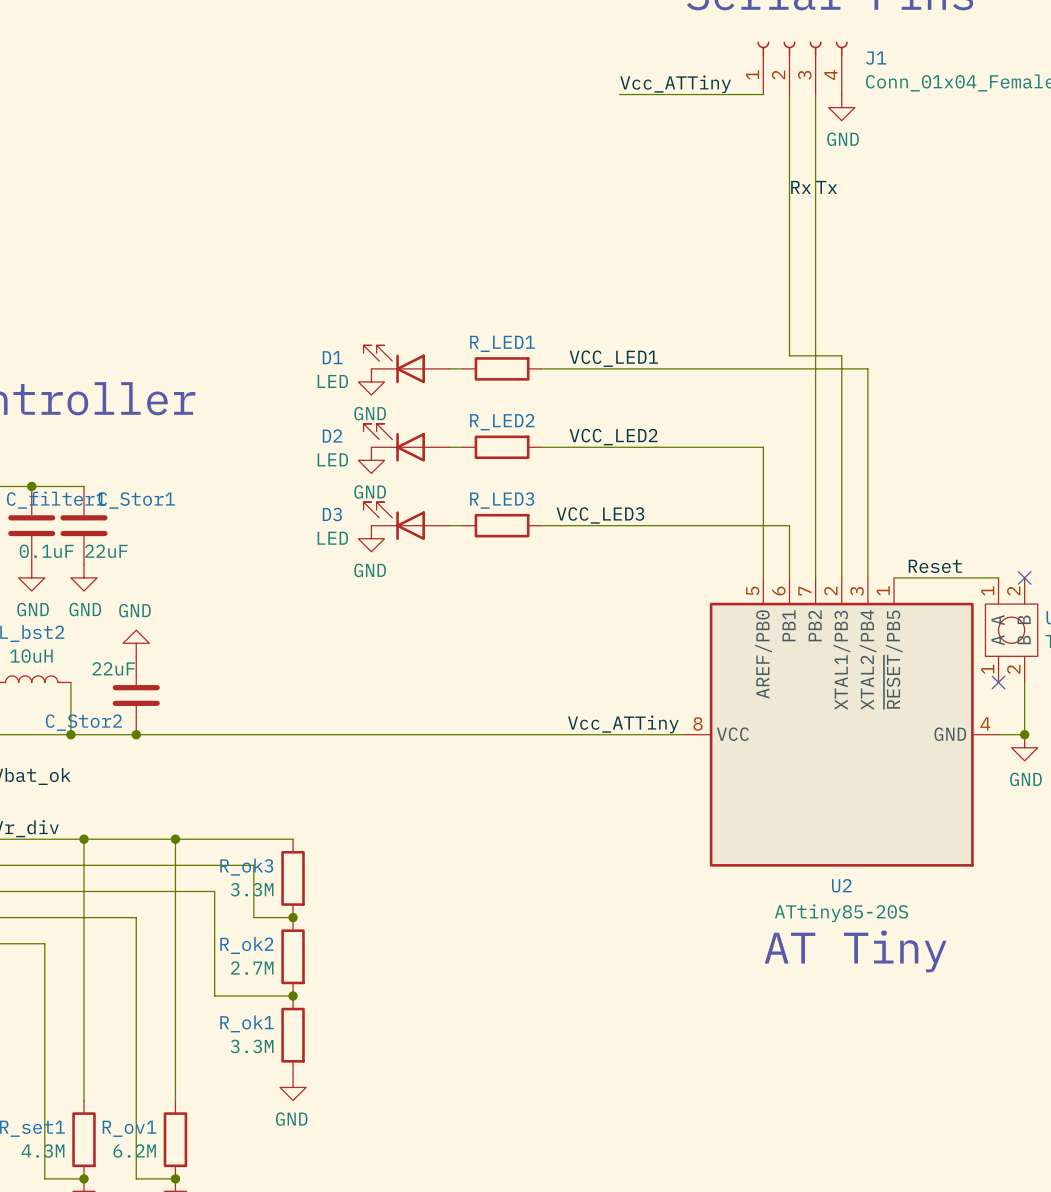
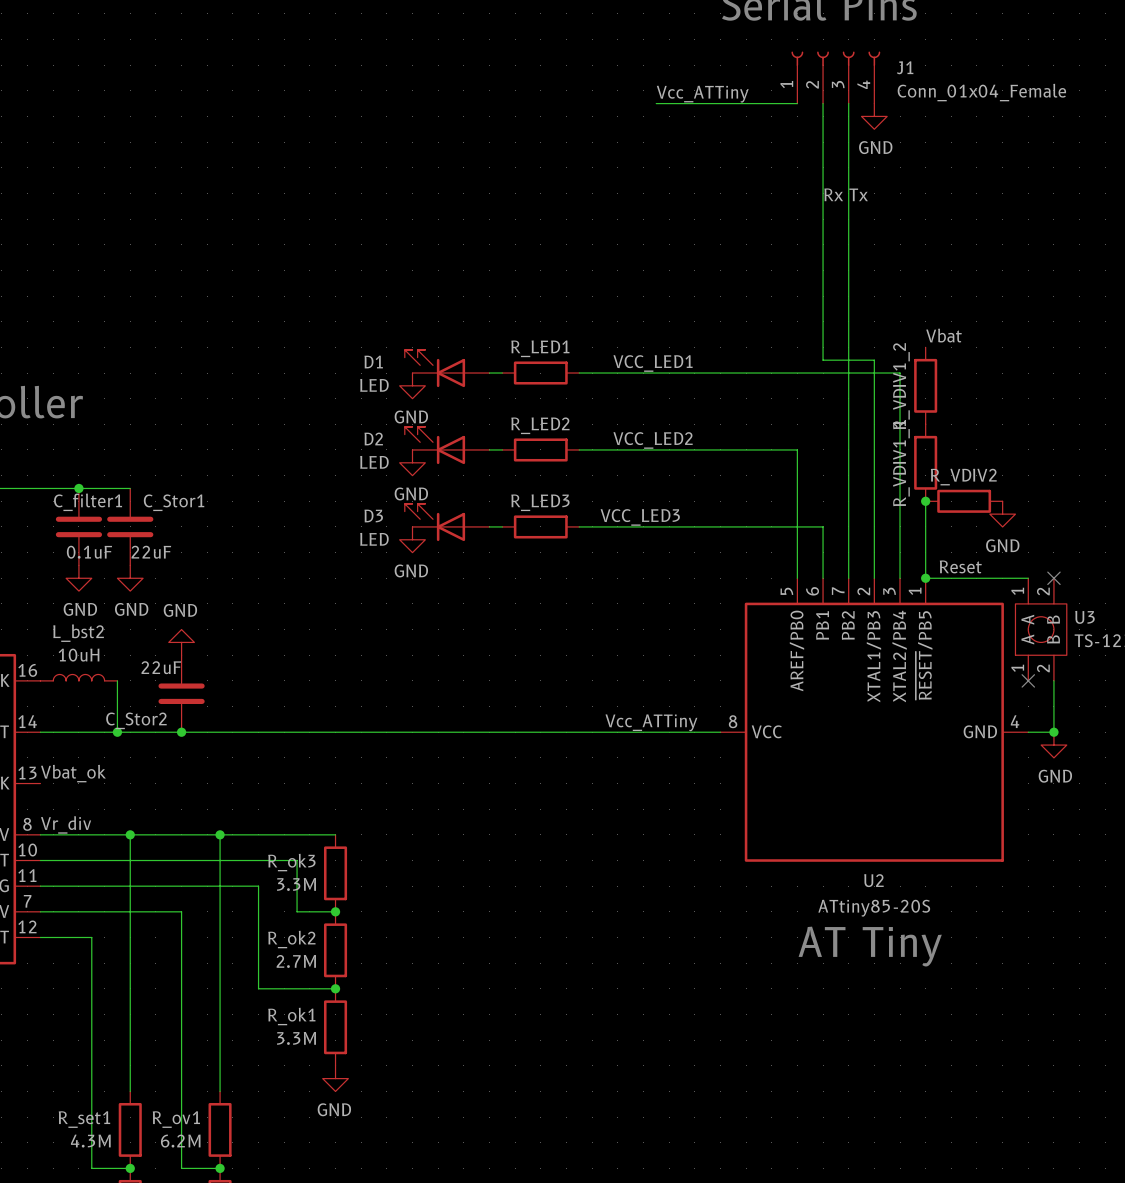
label: none -> Vbat (943, 335)
R_VDIV1_2: none -> (925, 385)
R_VDIV1_1: none -> (925, 462)
wire: none -> (925, 501) (925, 578)
junction: none -> (925, 501)
R_VDIV2: none -> (964, 501)
power symbol: none -> GND (1002, 514)
junction: none -> (925, 578)

